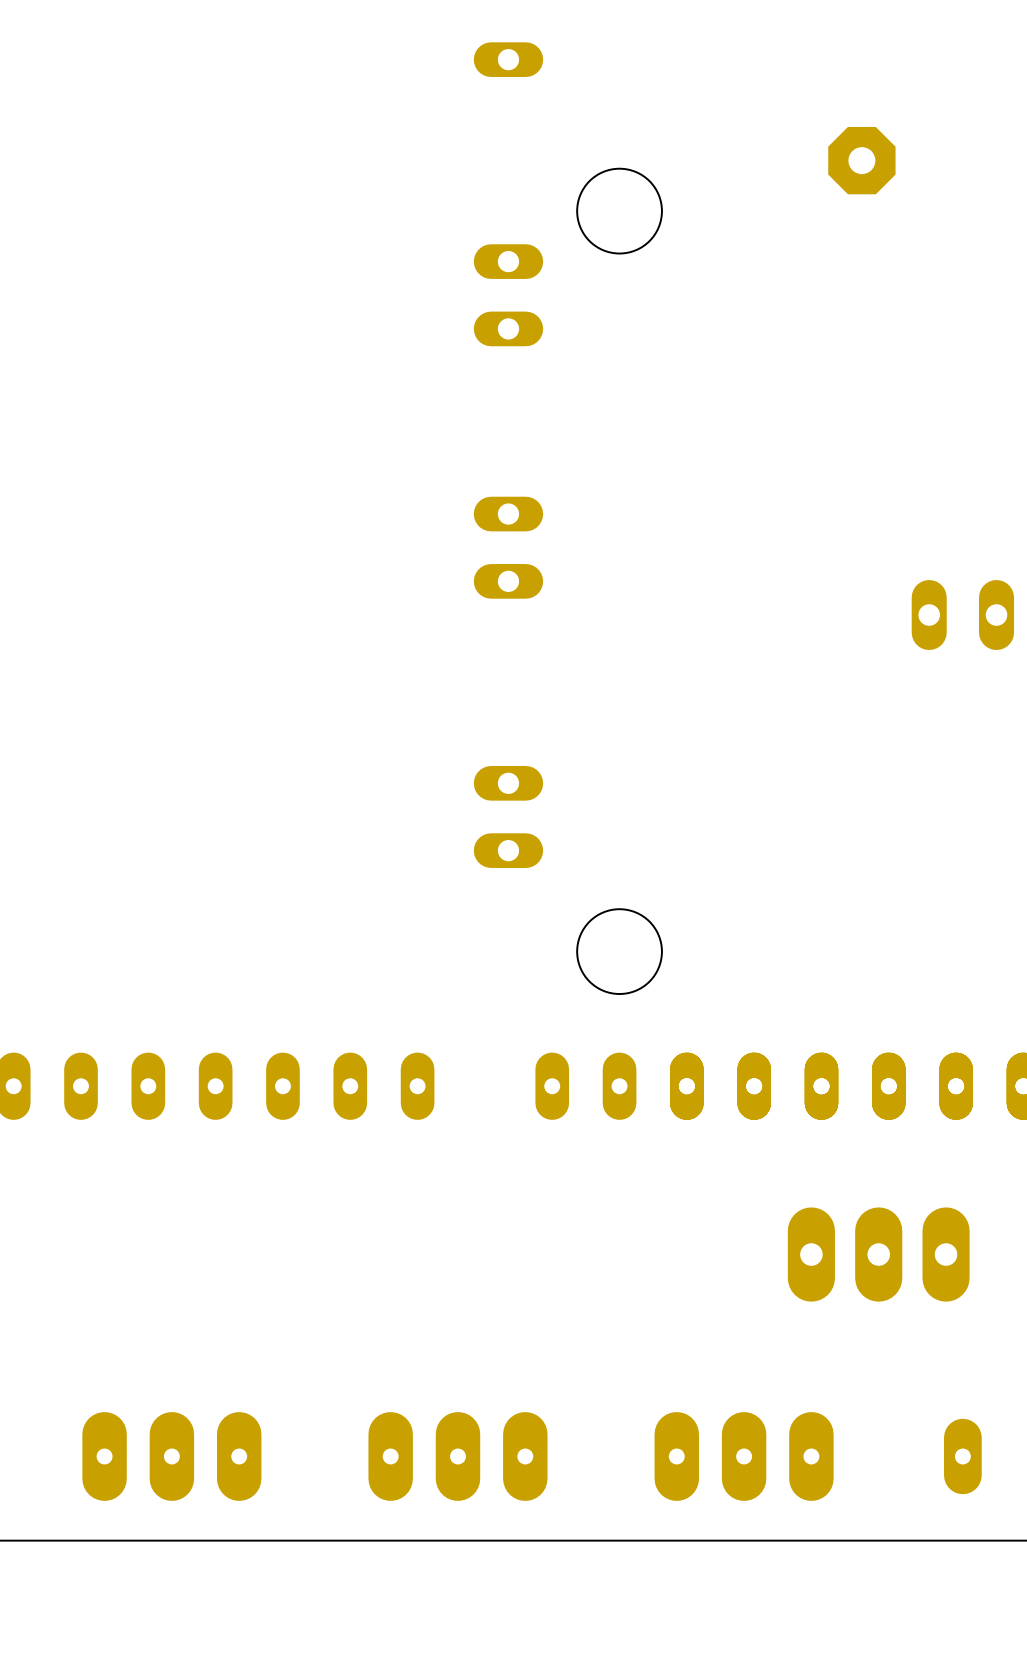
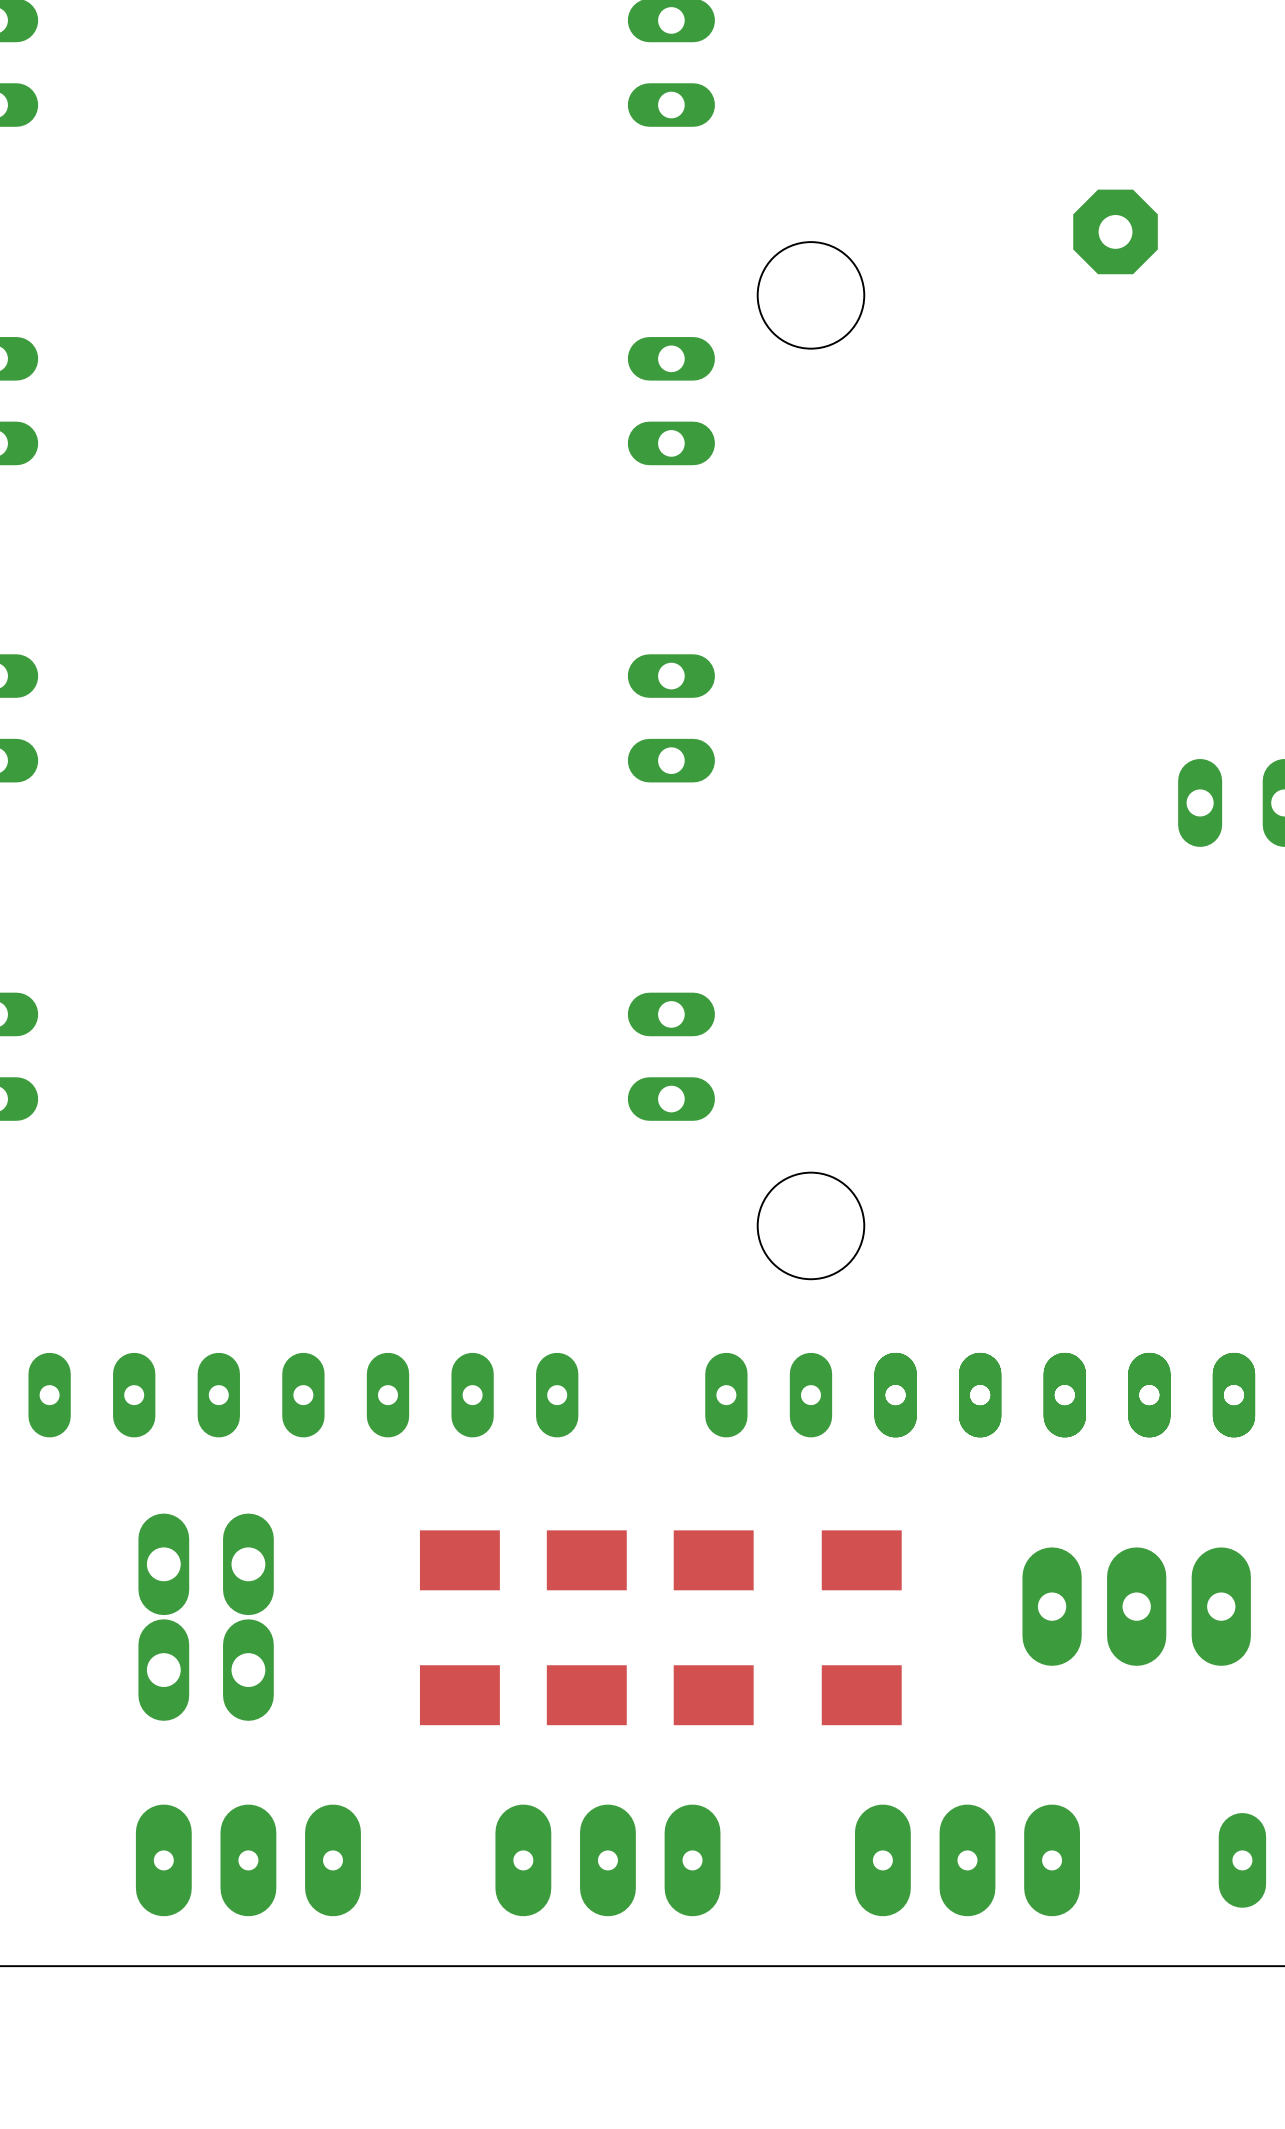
part: none -> (206, 1564)
part: none -> (459, 1627)
part: none -> (586, 1627)
part: none -> (713, 1627)
part: none -> (861, 1627)
part: none -> (206, 1670)

